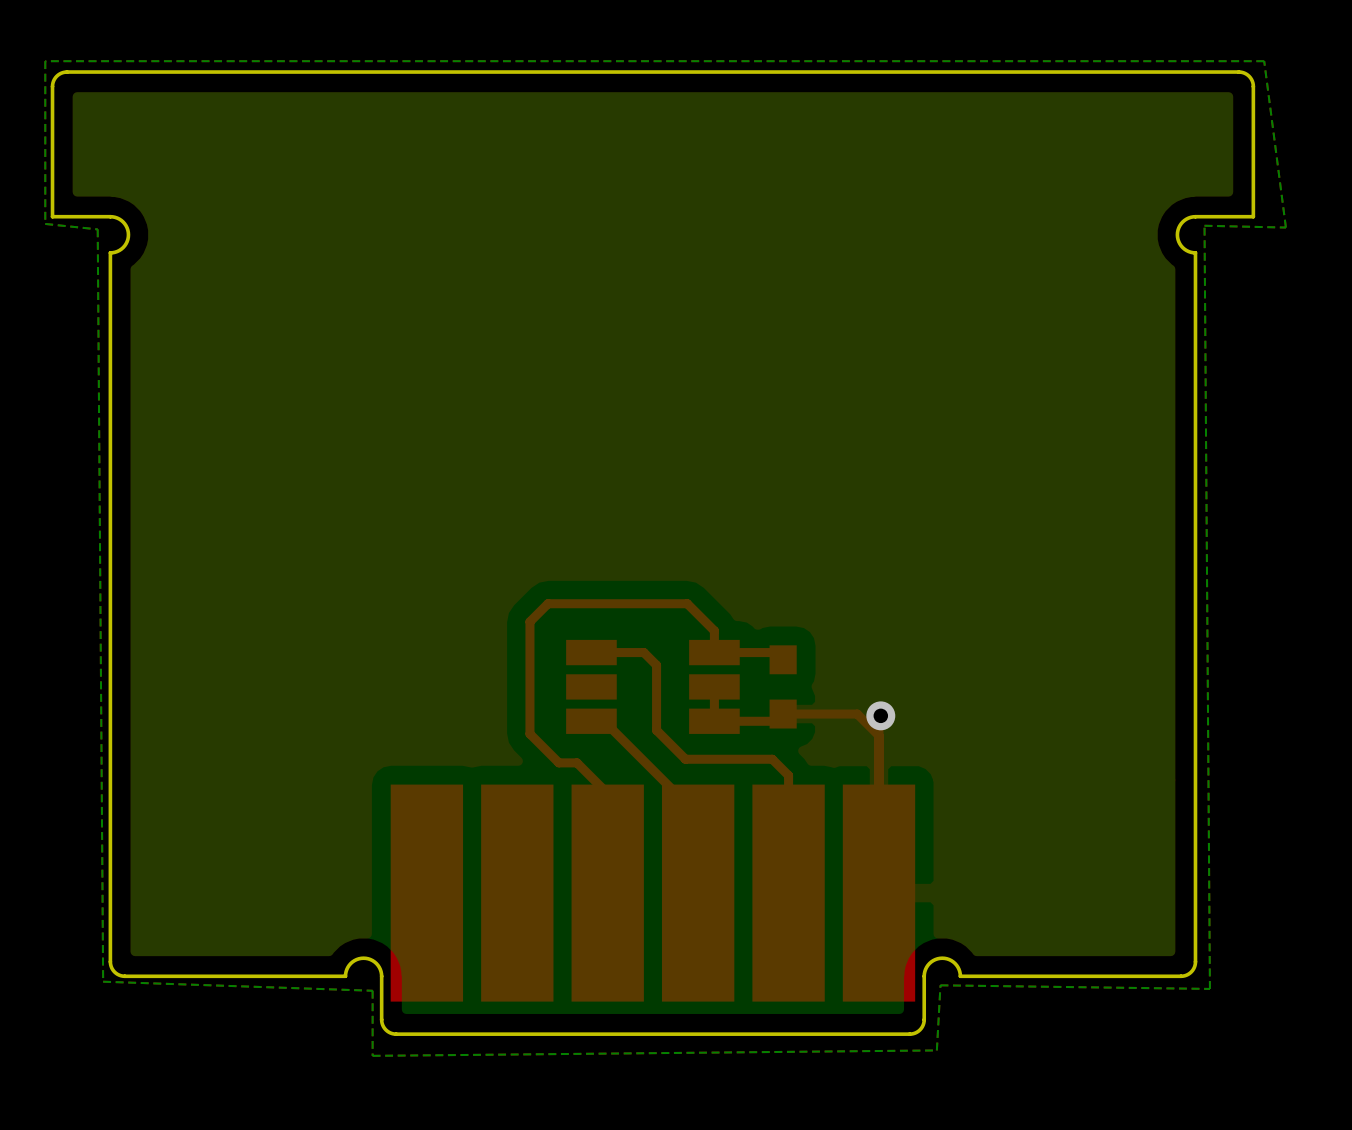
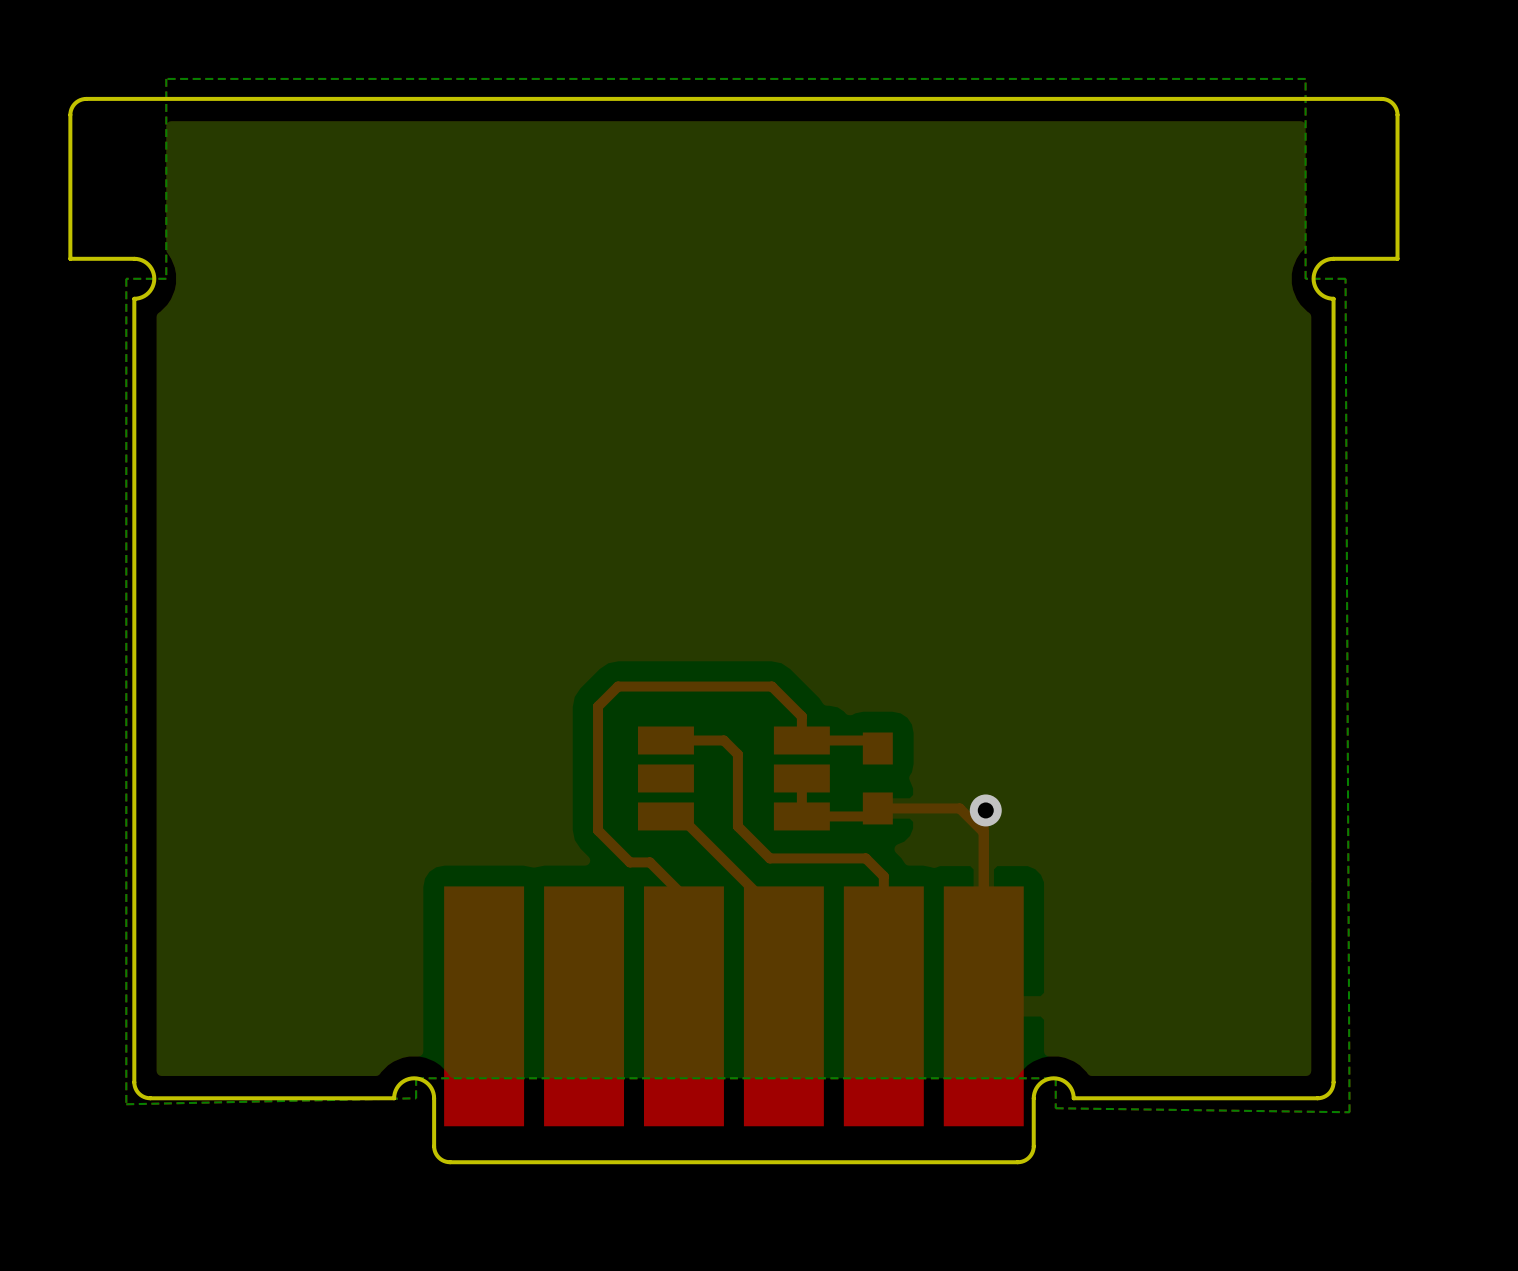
bottom zone outline: (1264, 61) (45, 61) (45, 223) (97, 229) (103, 981) (372, 990) (372, 1055) (936, 1050) (940, 985) (1209, 988) (1204, 225) (1285, 227) (1264, 61) -> (1305, 78) (1305, 278) (1345, 278) (1349, 1112) (1055, 1108) (1055, 1078) (416, 1078) (416, 1098) (126, 1104) (126, 278) (166, 278) (166, 78) (1305, 78)

